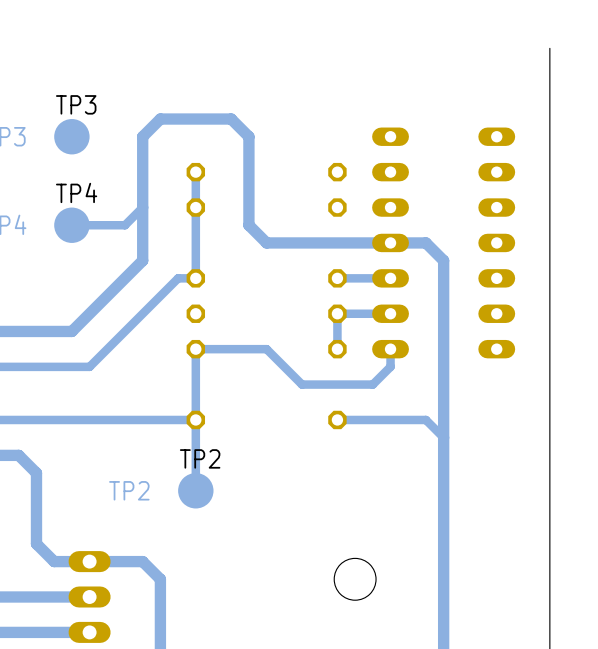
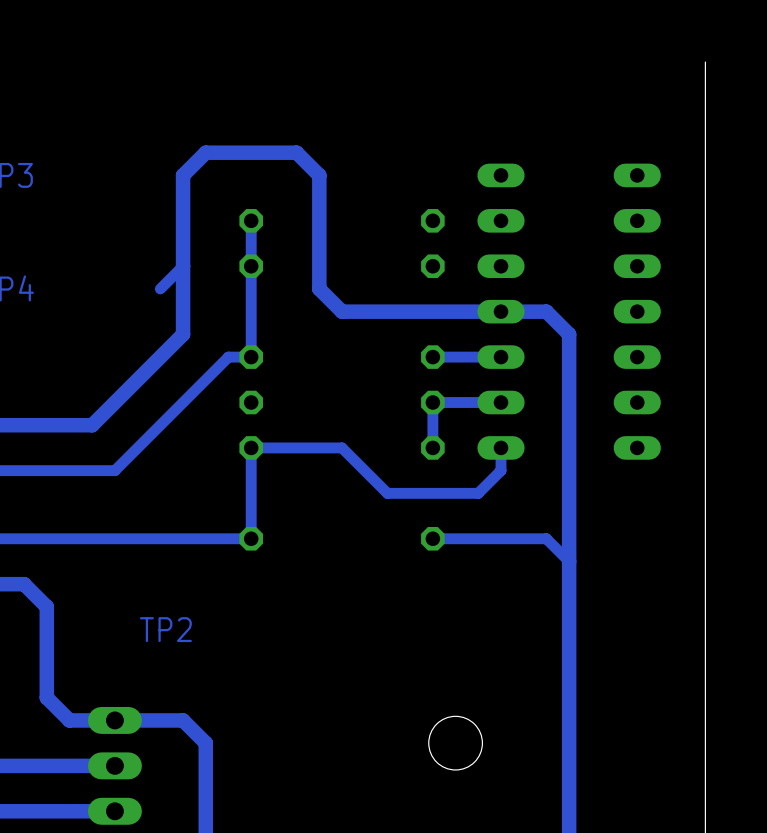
TP3: (71, 136) -> none
TP4: (71, 225) -> none
track: (125, 225) (71, 225) -> none
track: (195, 419) (195, 490) -> none
TP2: (195, 490) -> none

